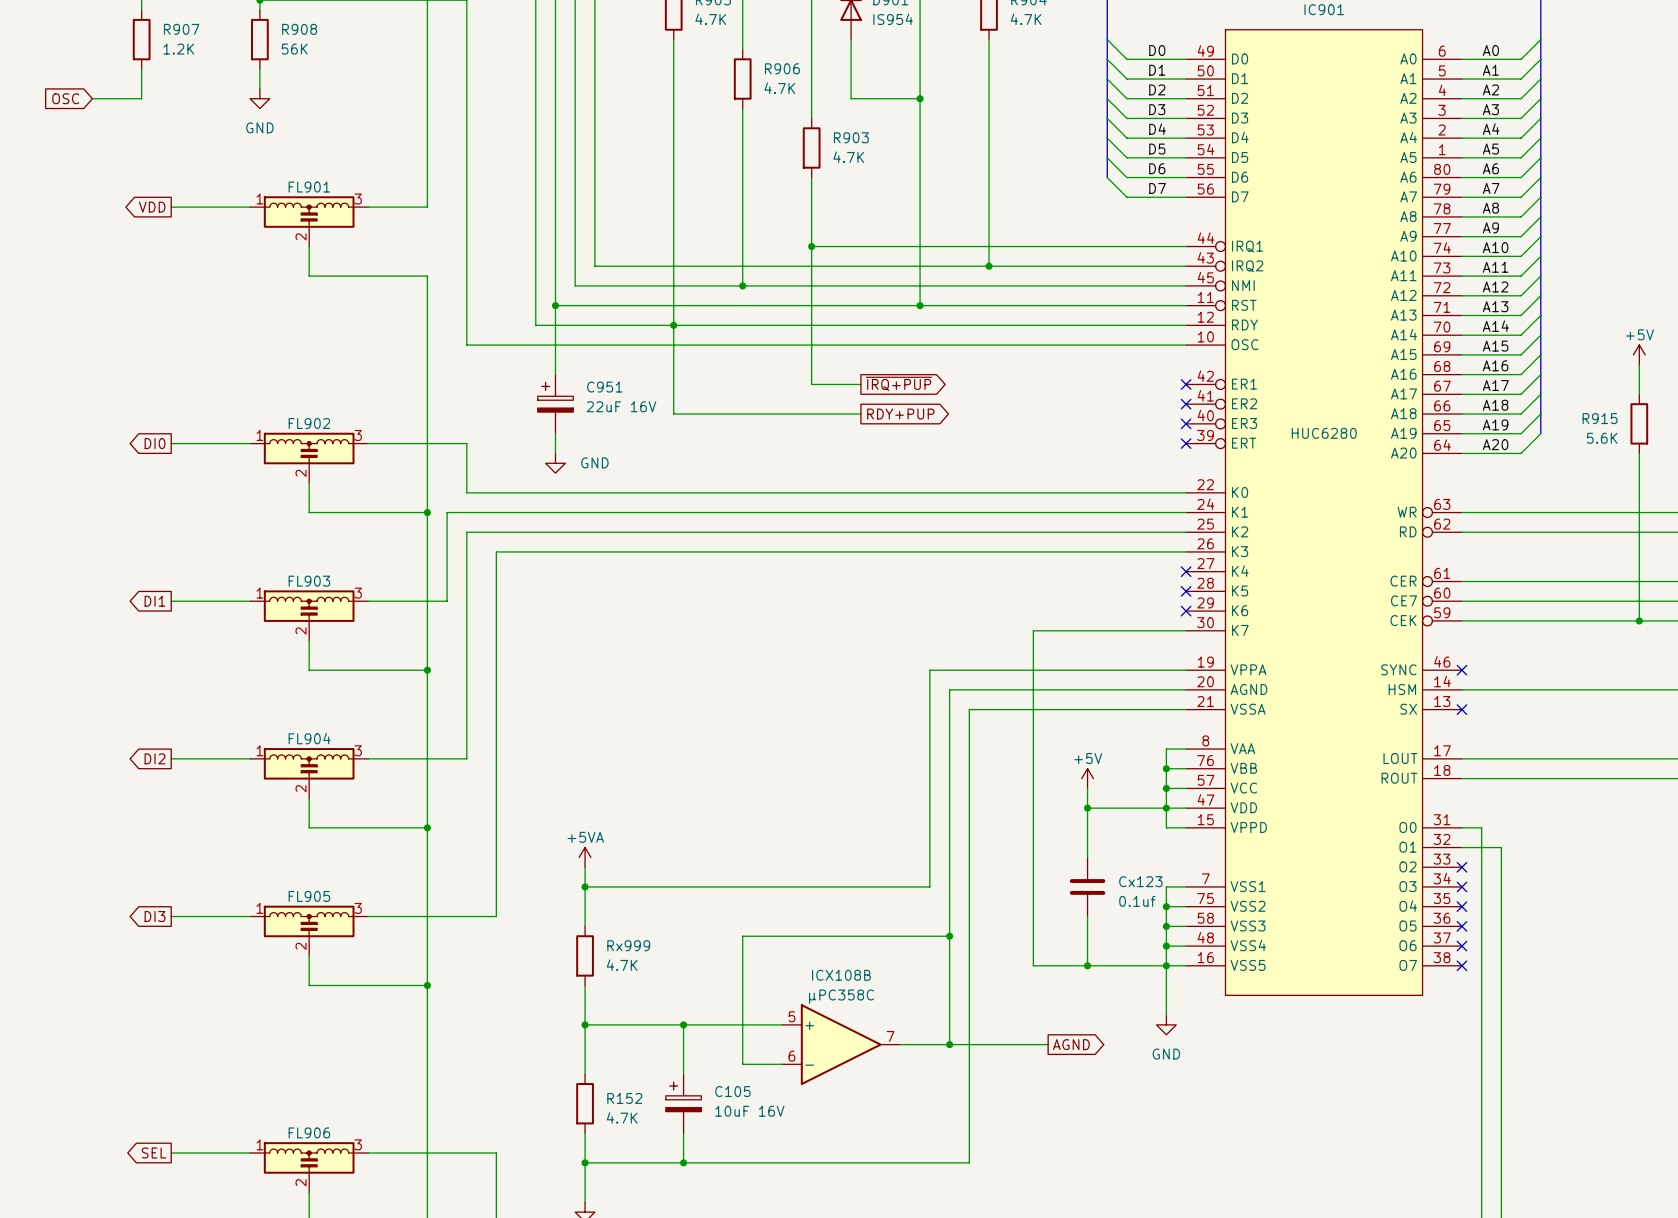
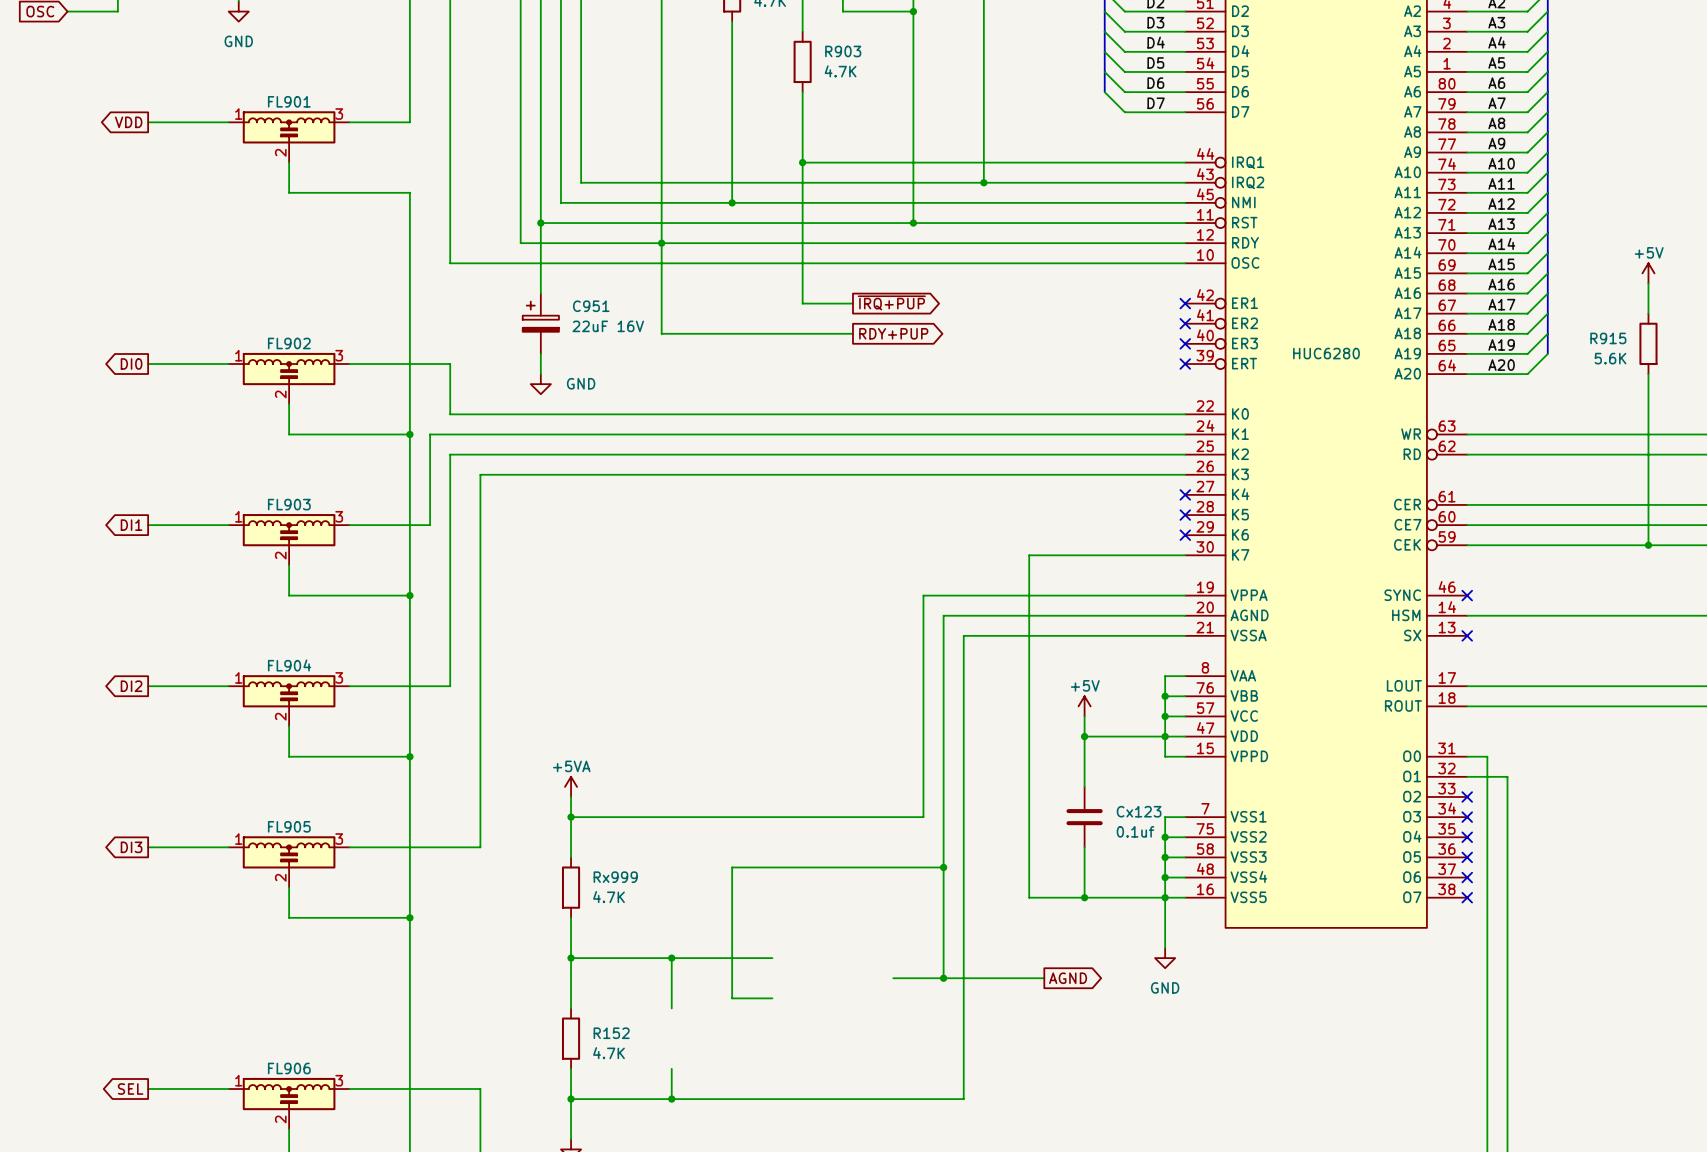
ICX108B: μPC358C (841, 1044) -> none
C105: 10uF 16V (683, 1103) -> none

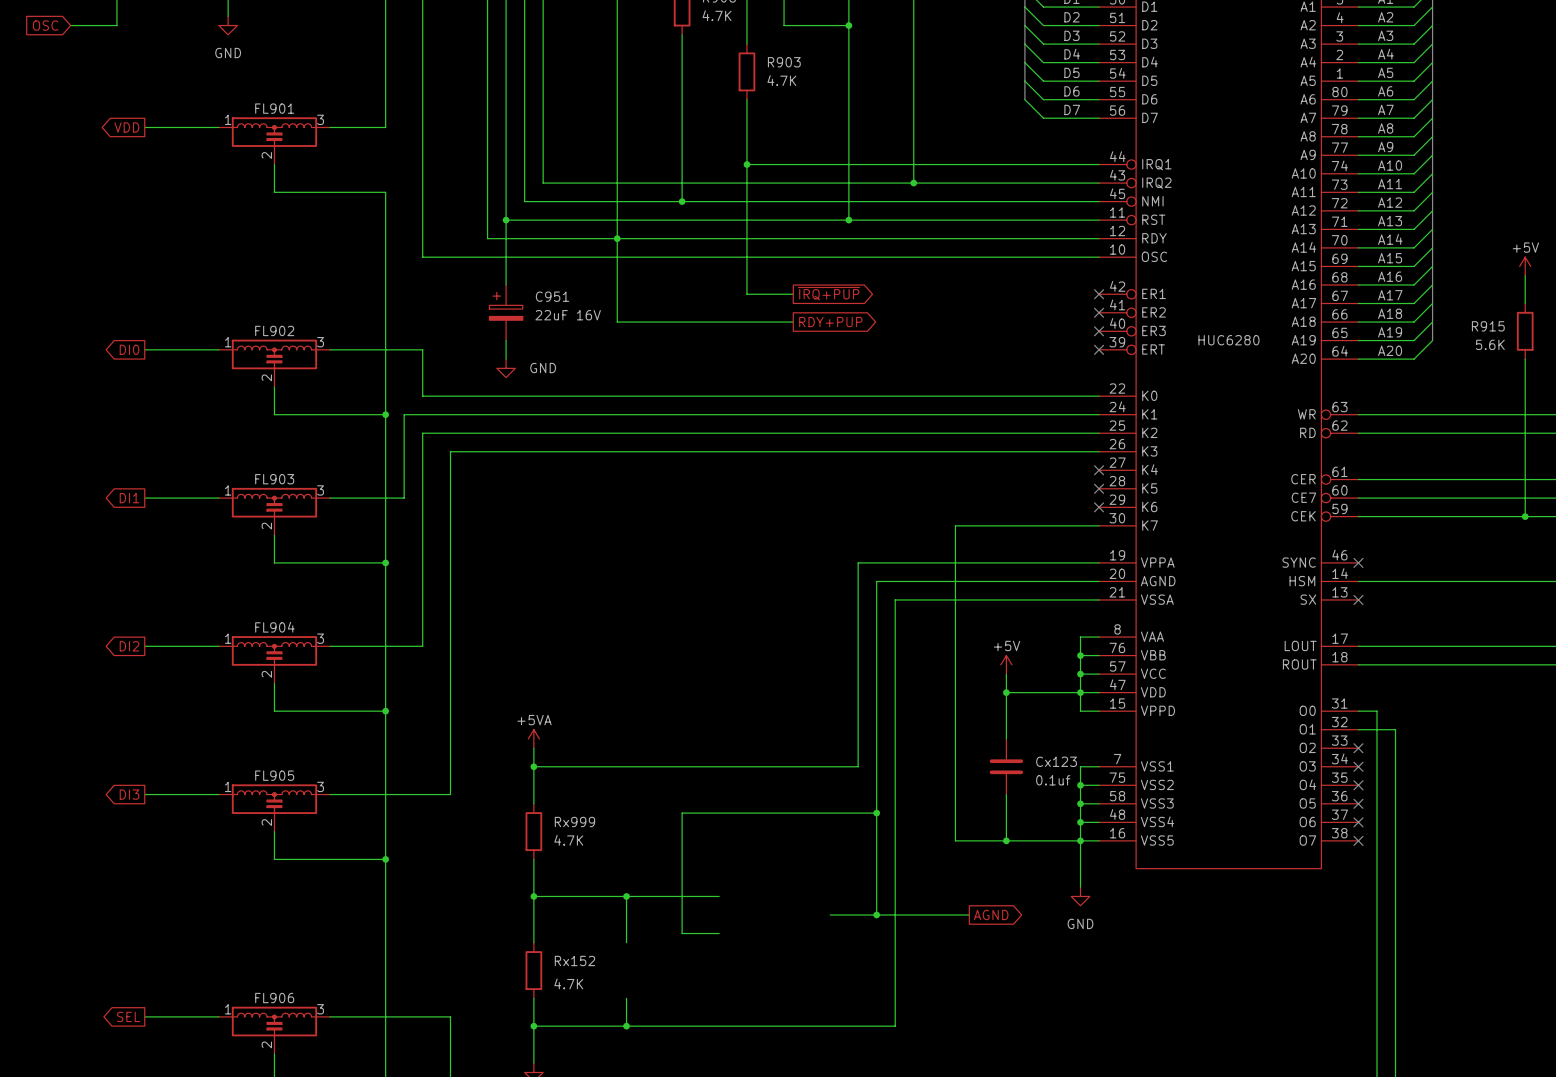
R152 name: R152 (611, 1033) -> Rx152 (574, 960)

